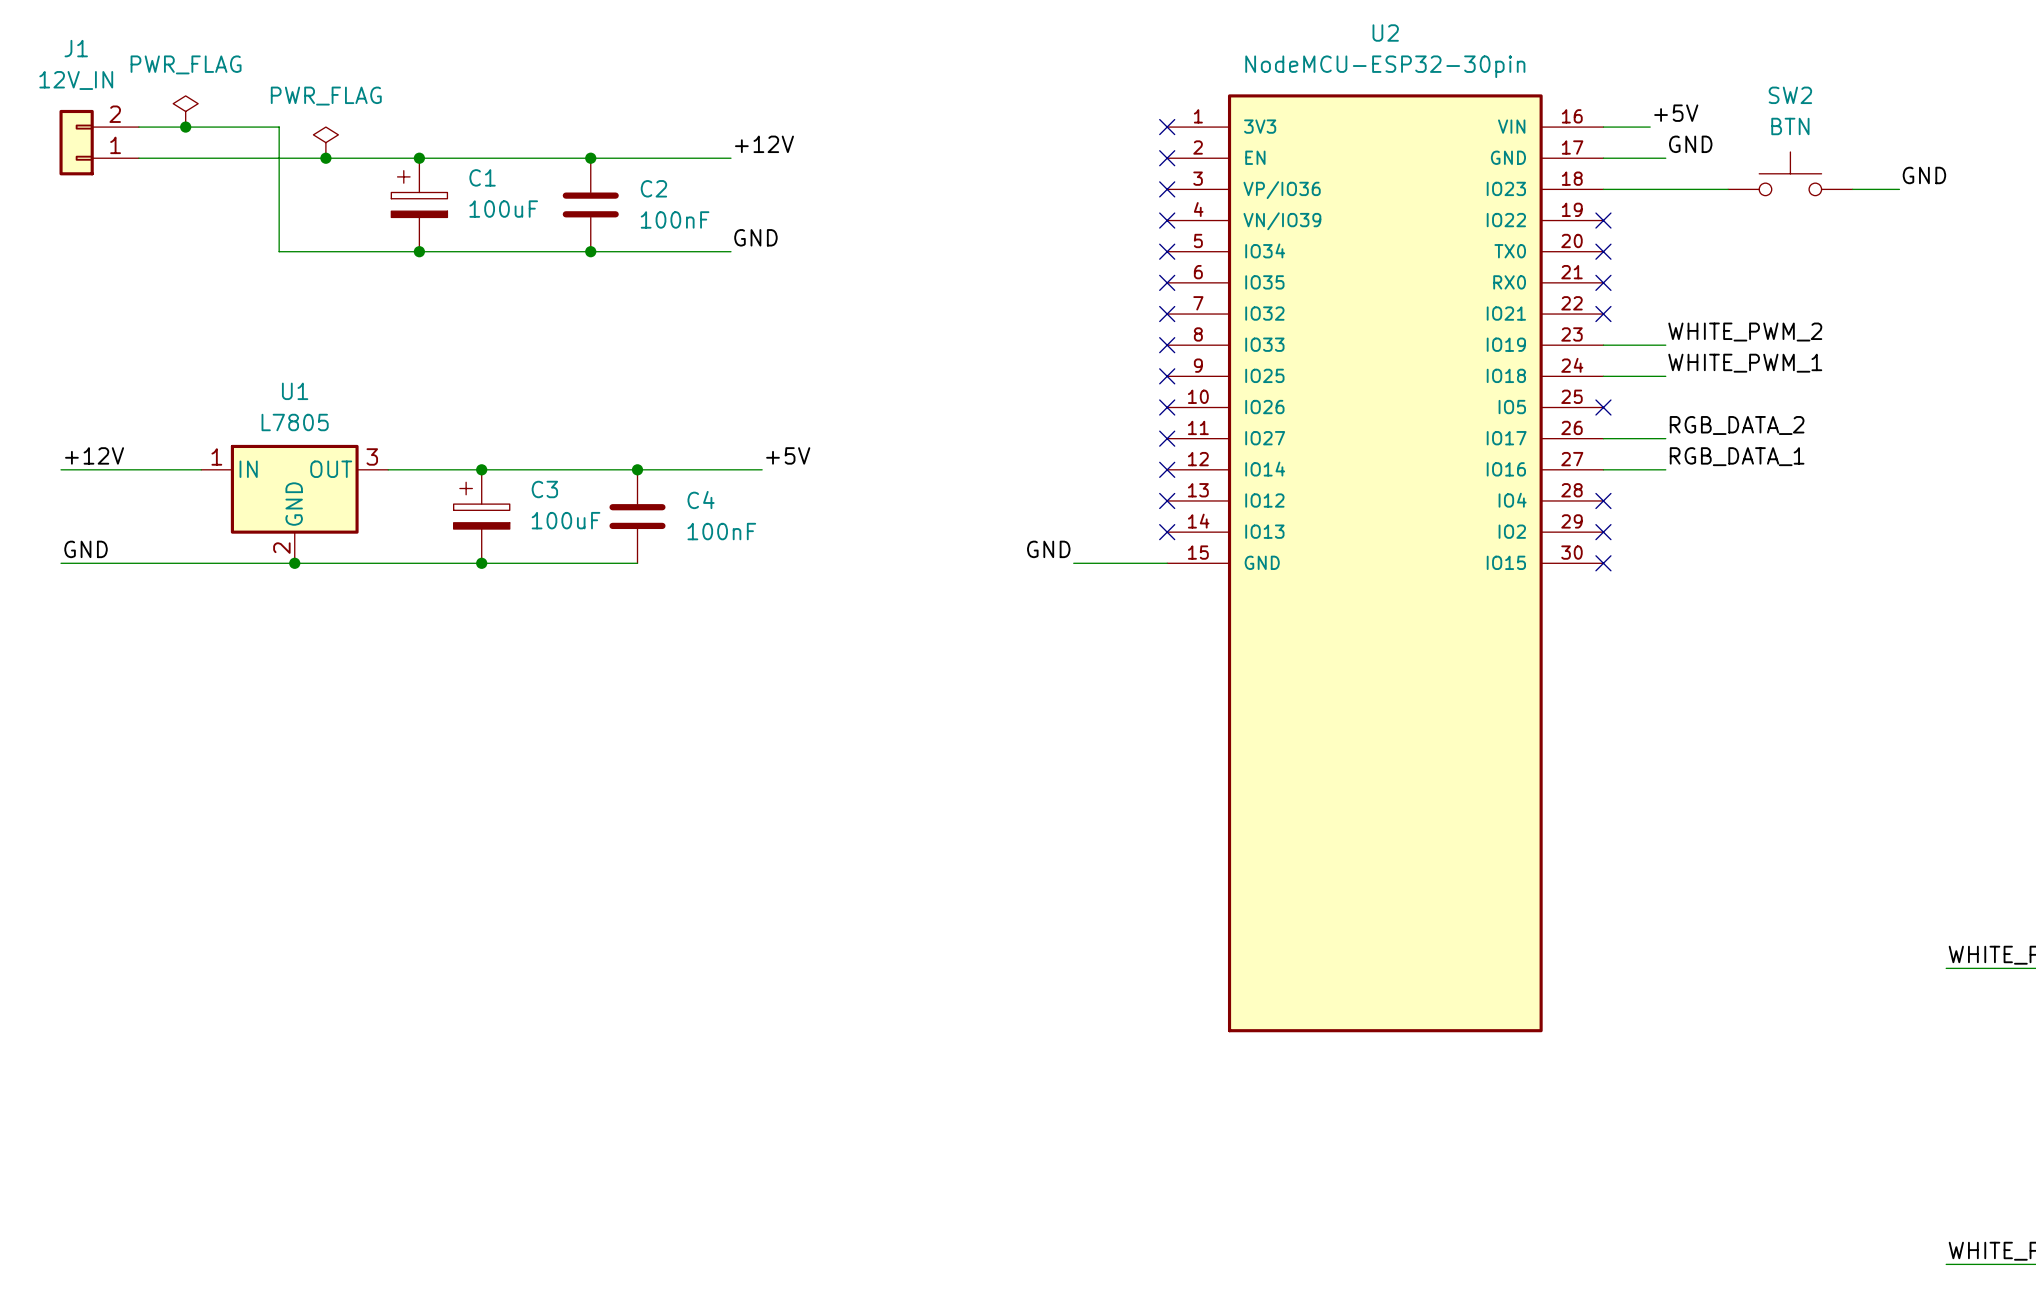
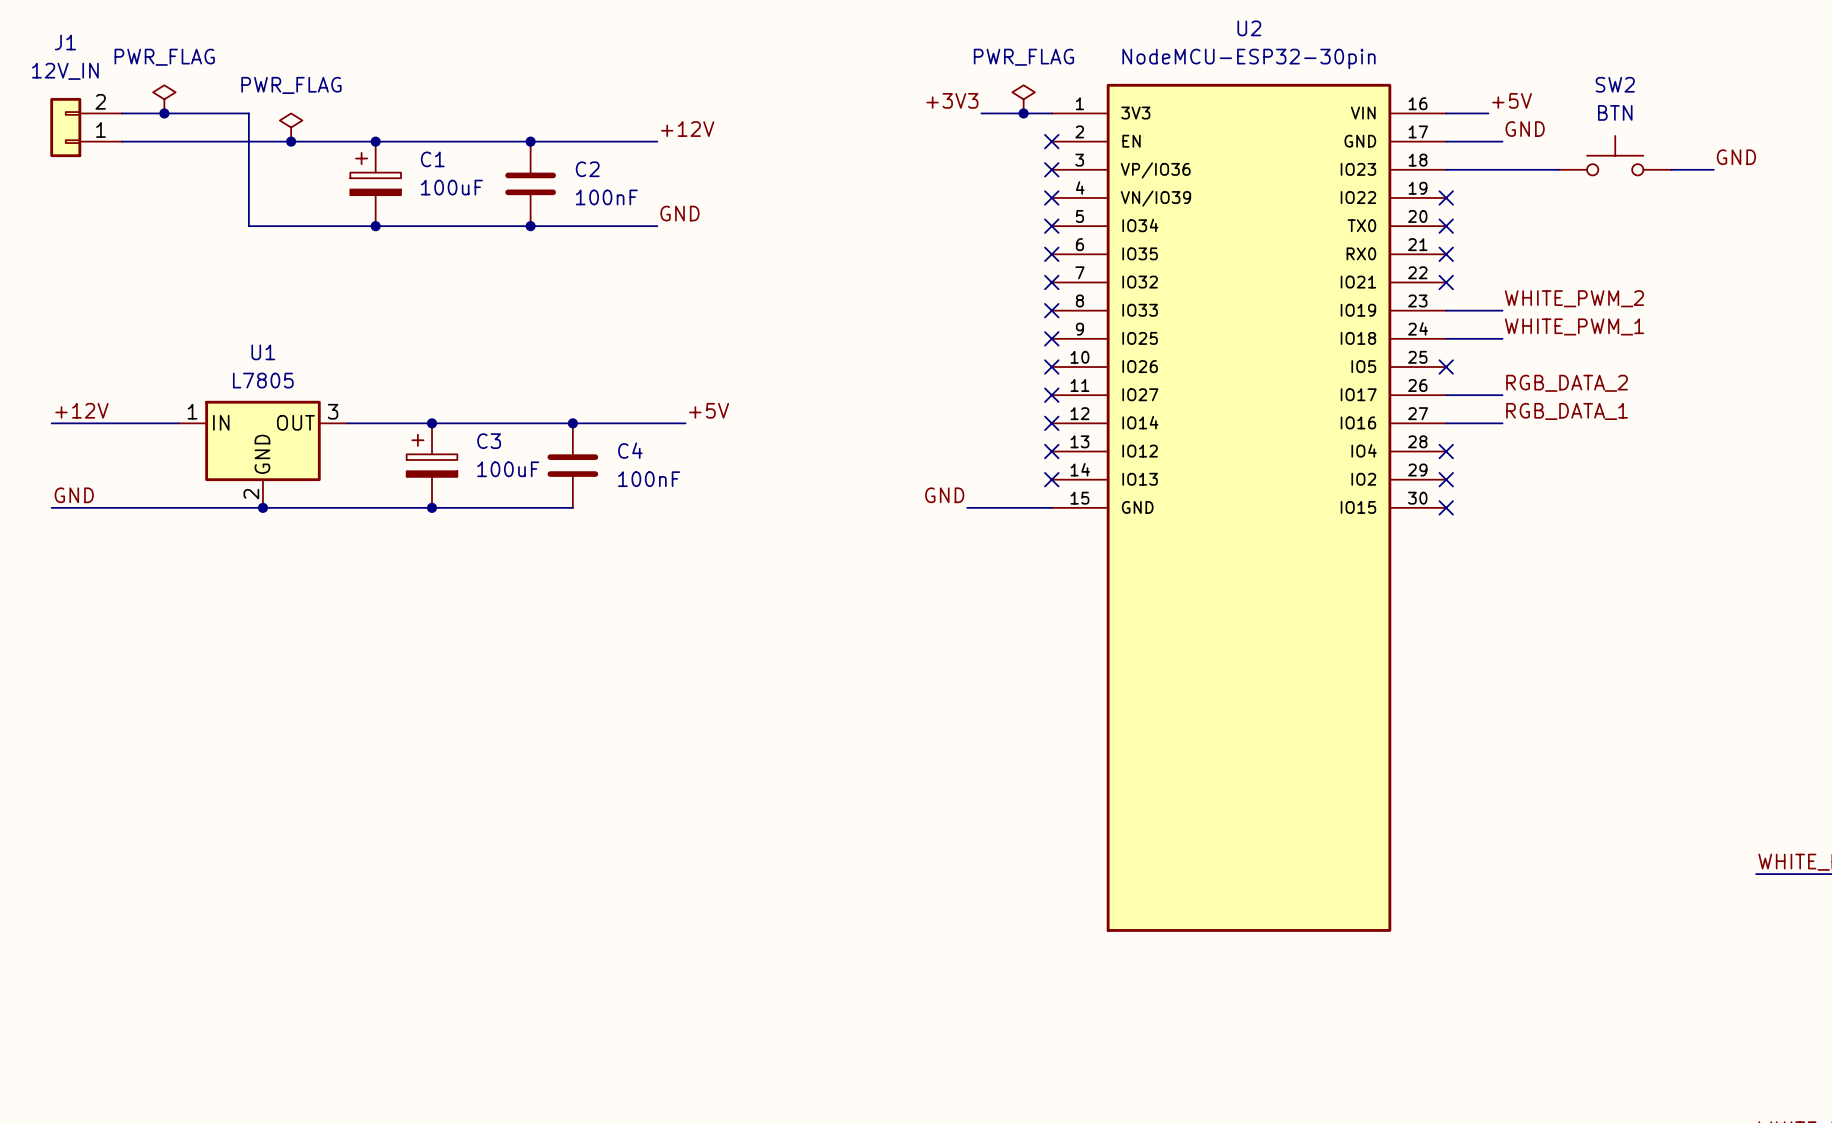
power symbol: none -> PWR_FLAG (1023, 99)
label: none -> +3V3 (952, 100)
wire: none -> (981, 113) (1051, 113)
junction: none -> (1023, 113)
no-connect mark: (1167, 127) -> none

